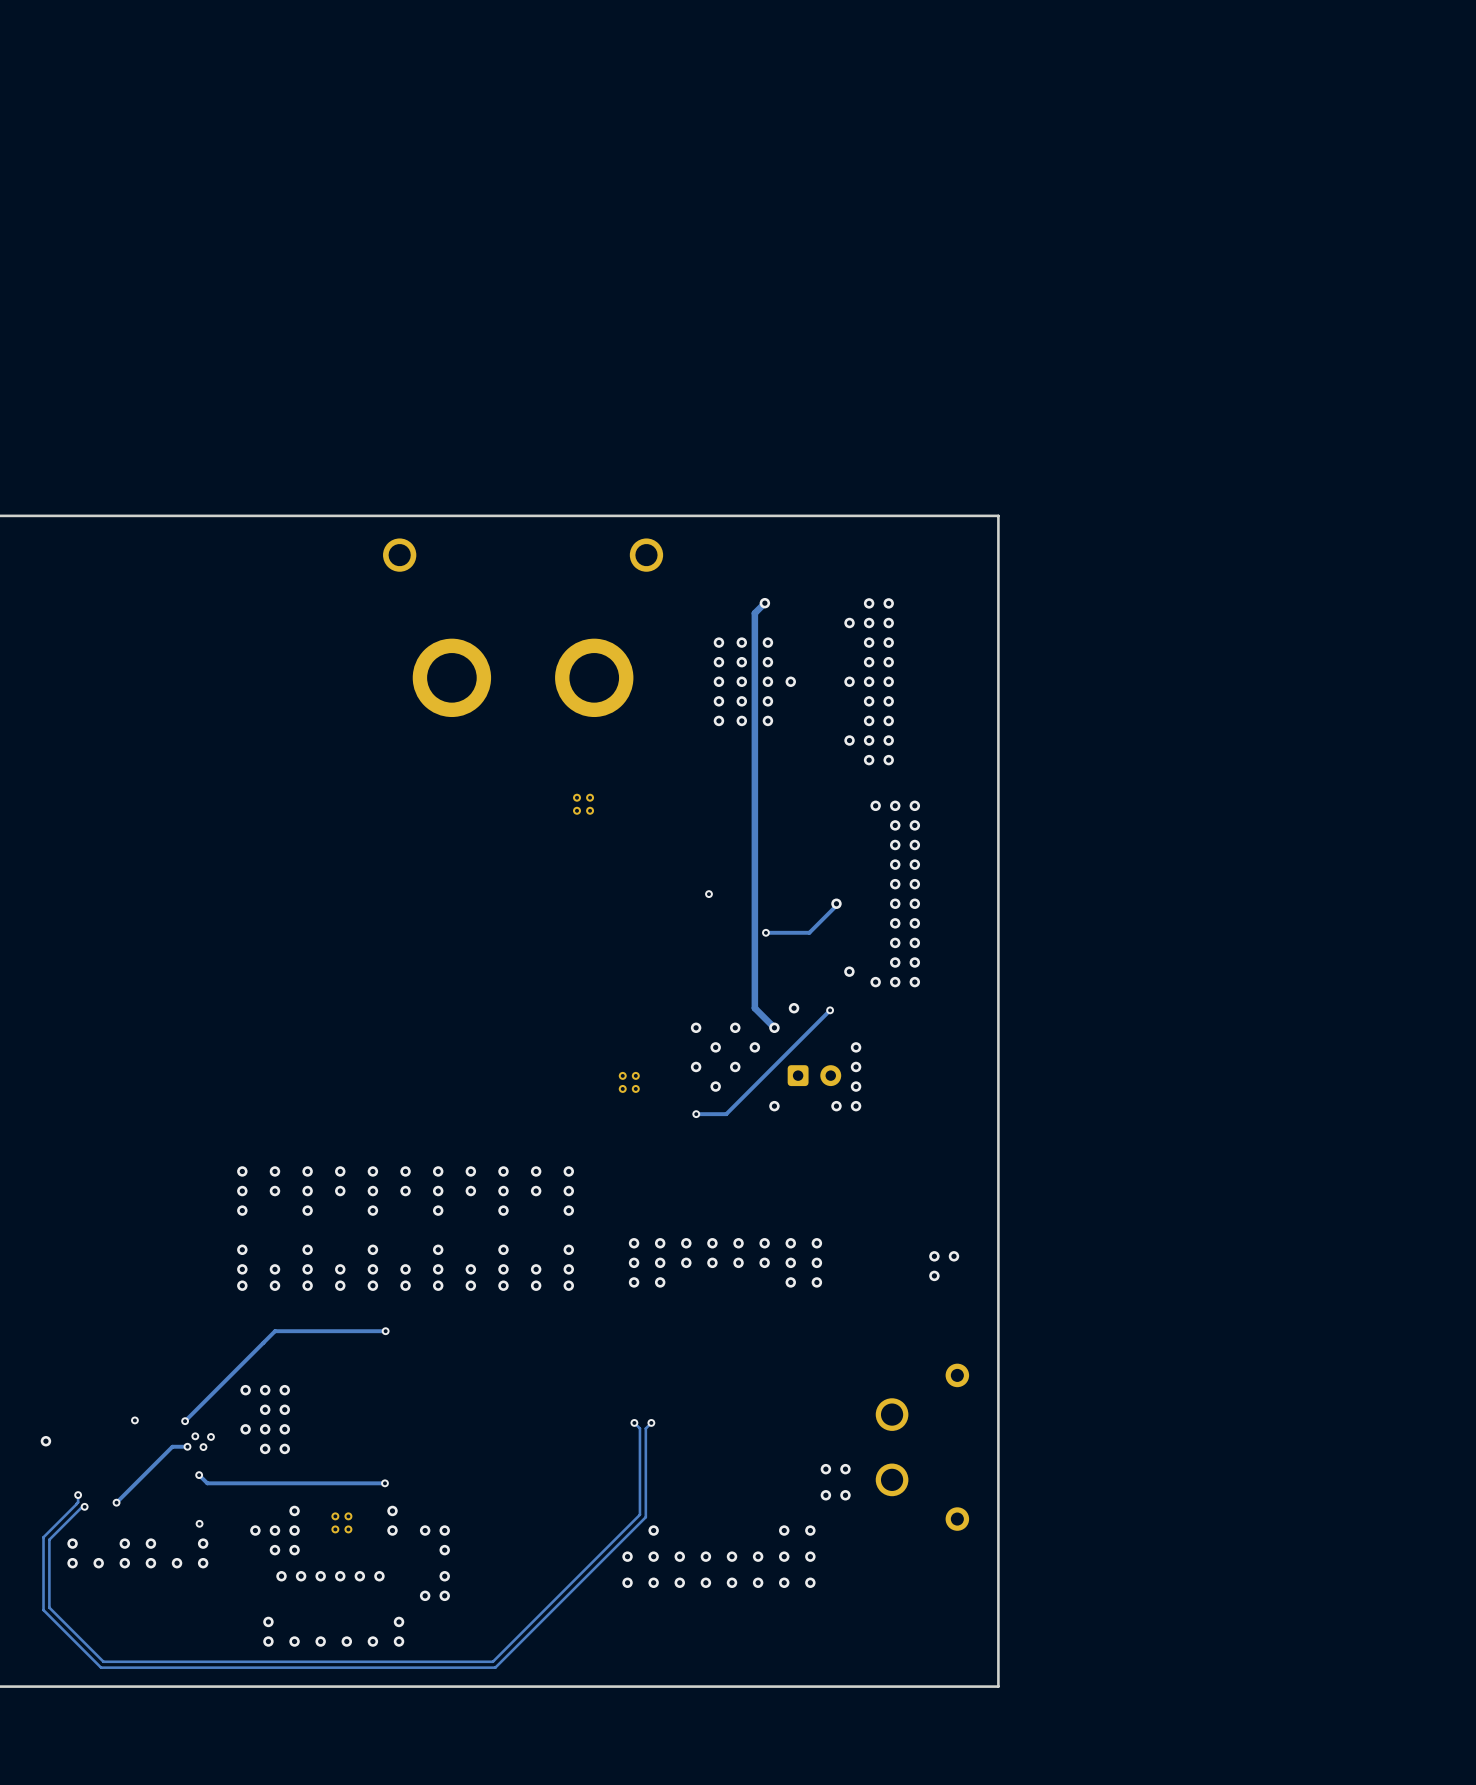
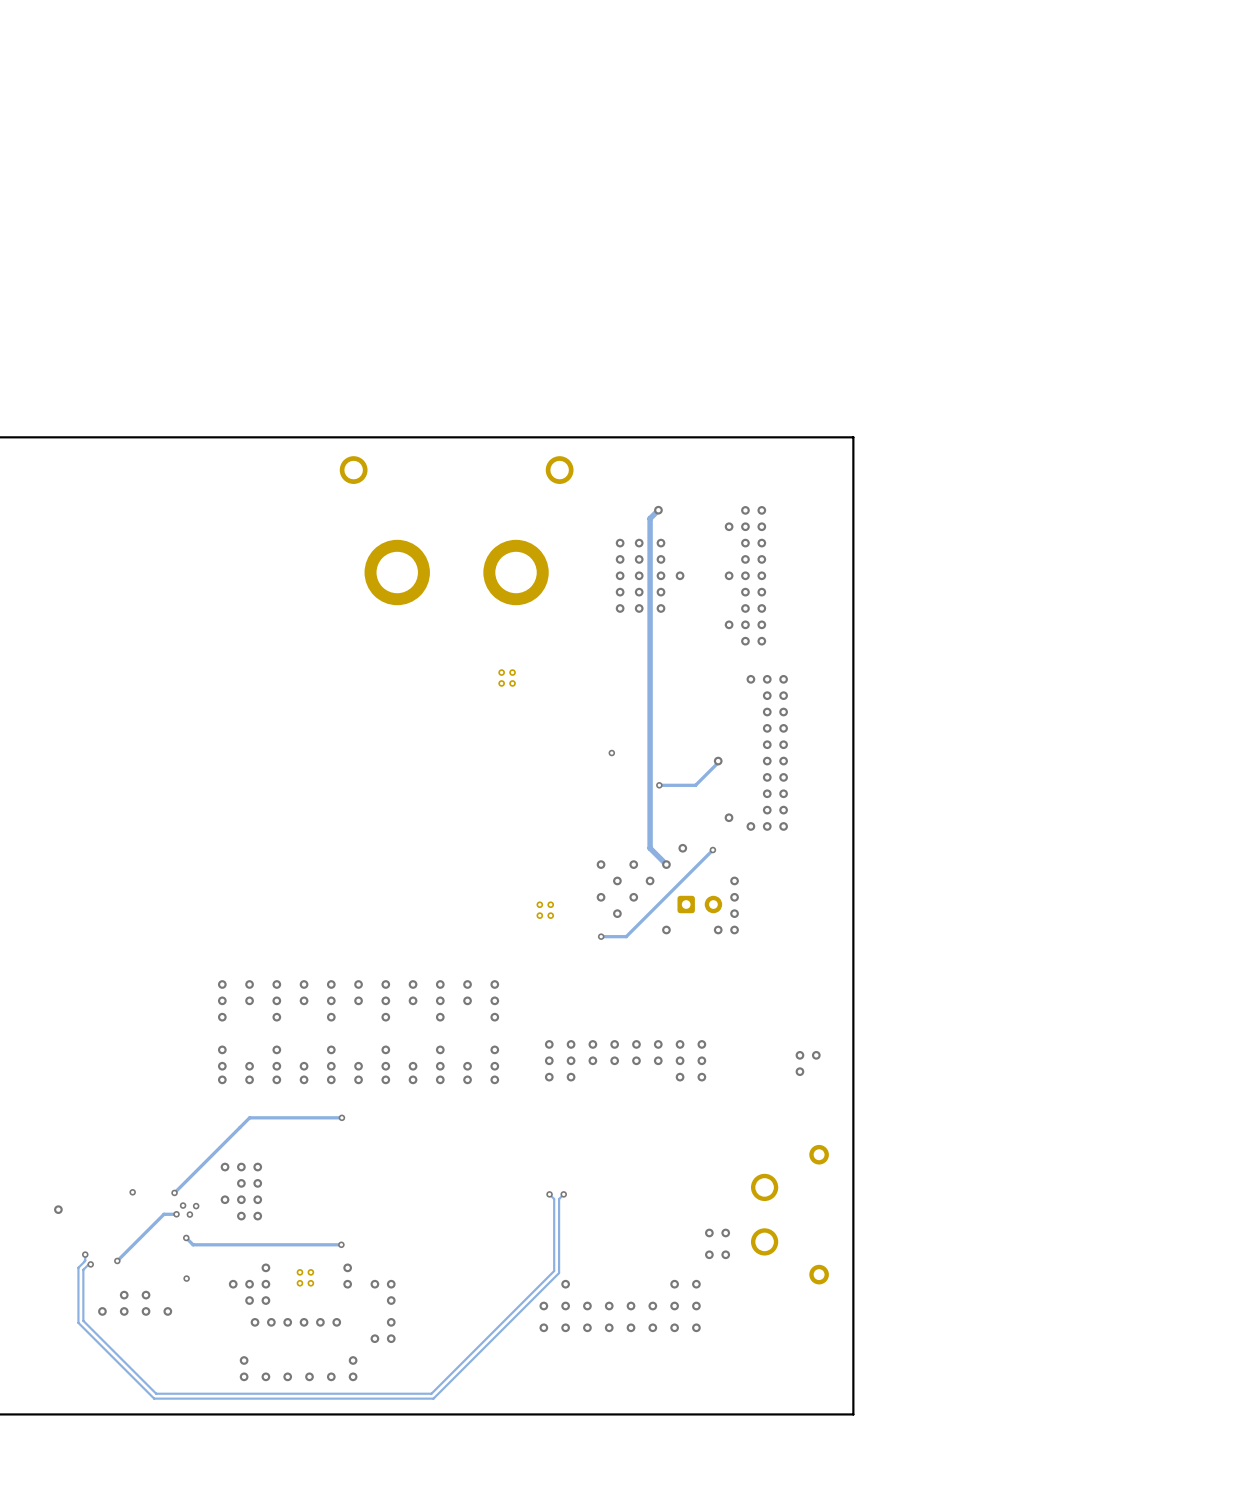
track: (69, 1510) (43, 1537) (43, 1610) (101, 1667) (160, 1667) -> (78, 1267) (78, 1322) (154, 1398)
track: (75, 1513) (49, 1539) (49, 1607) (103, 1661) (163, 1661) -> (83, 1269) (83, 1320) (156, 1393)
via: (72, 1543) -> none
via: (203, 1543) -> none
via: (72, 1563) -> none
via: (203, 1563) -> none

